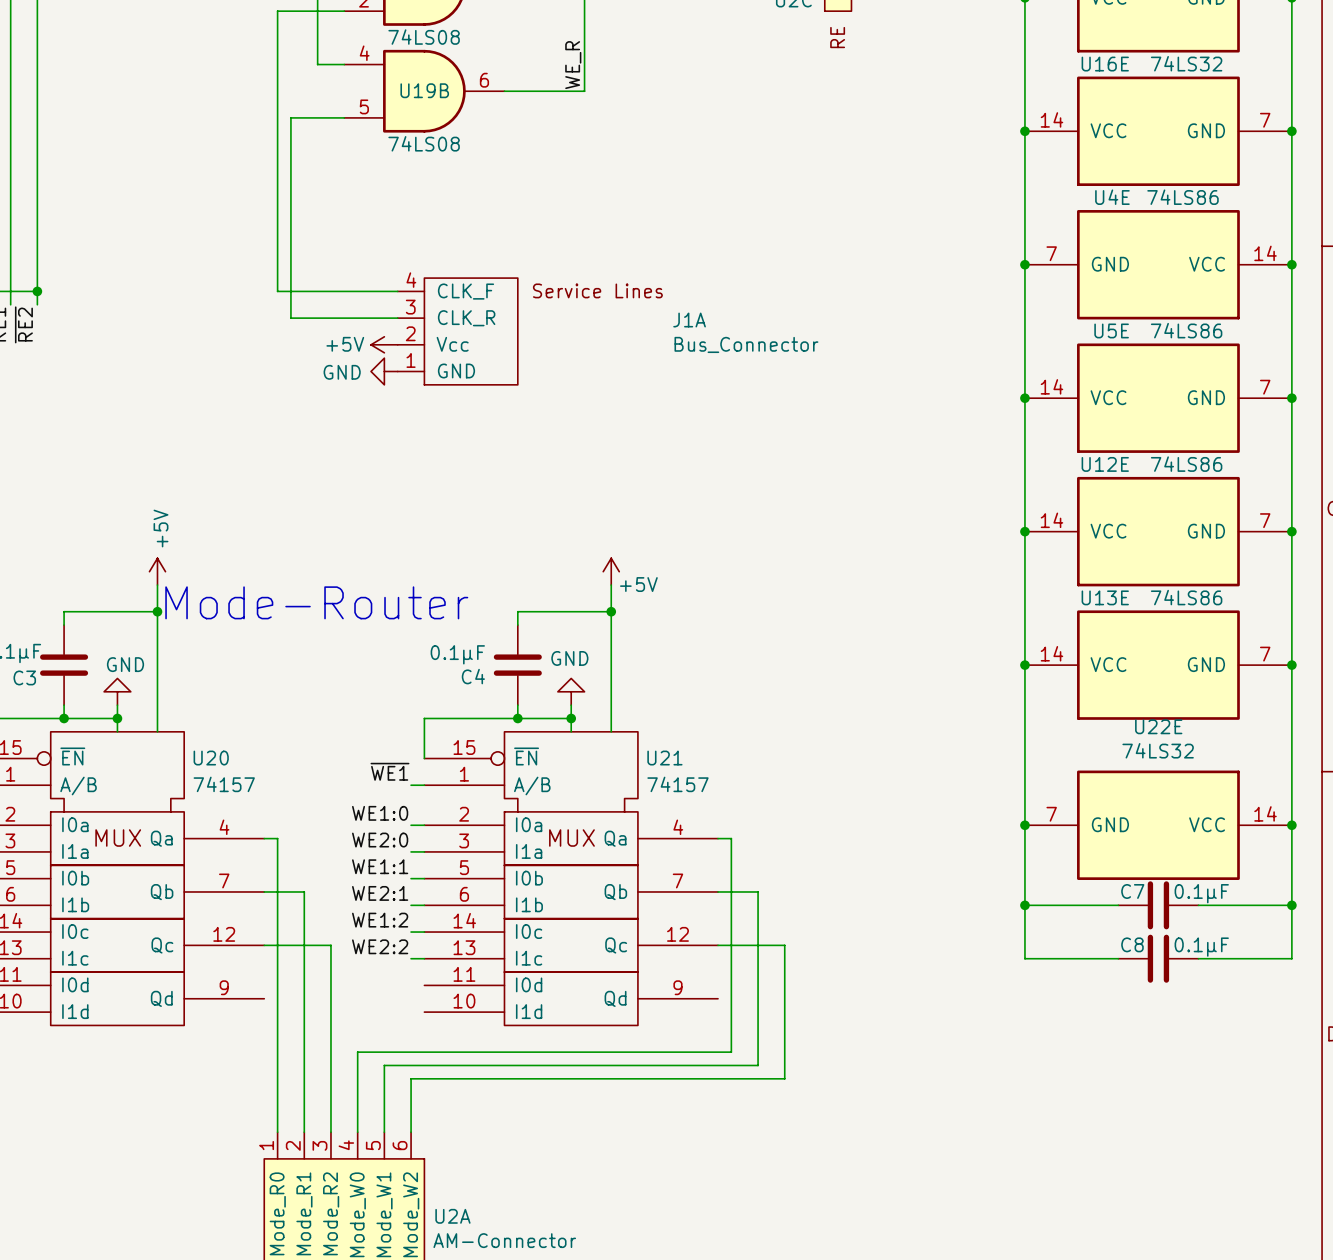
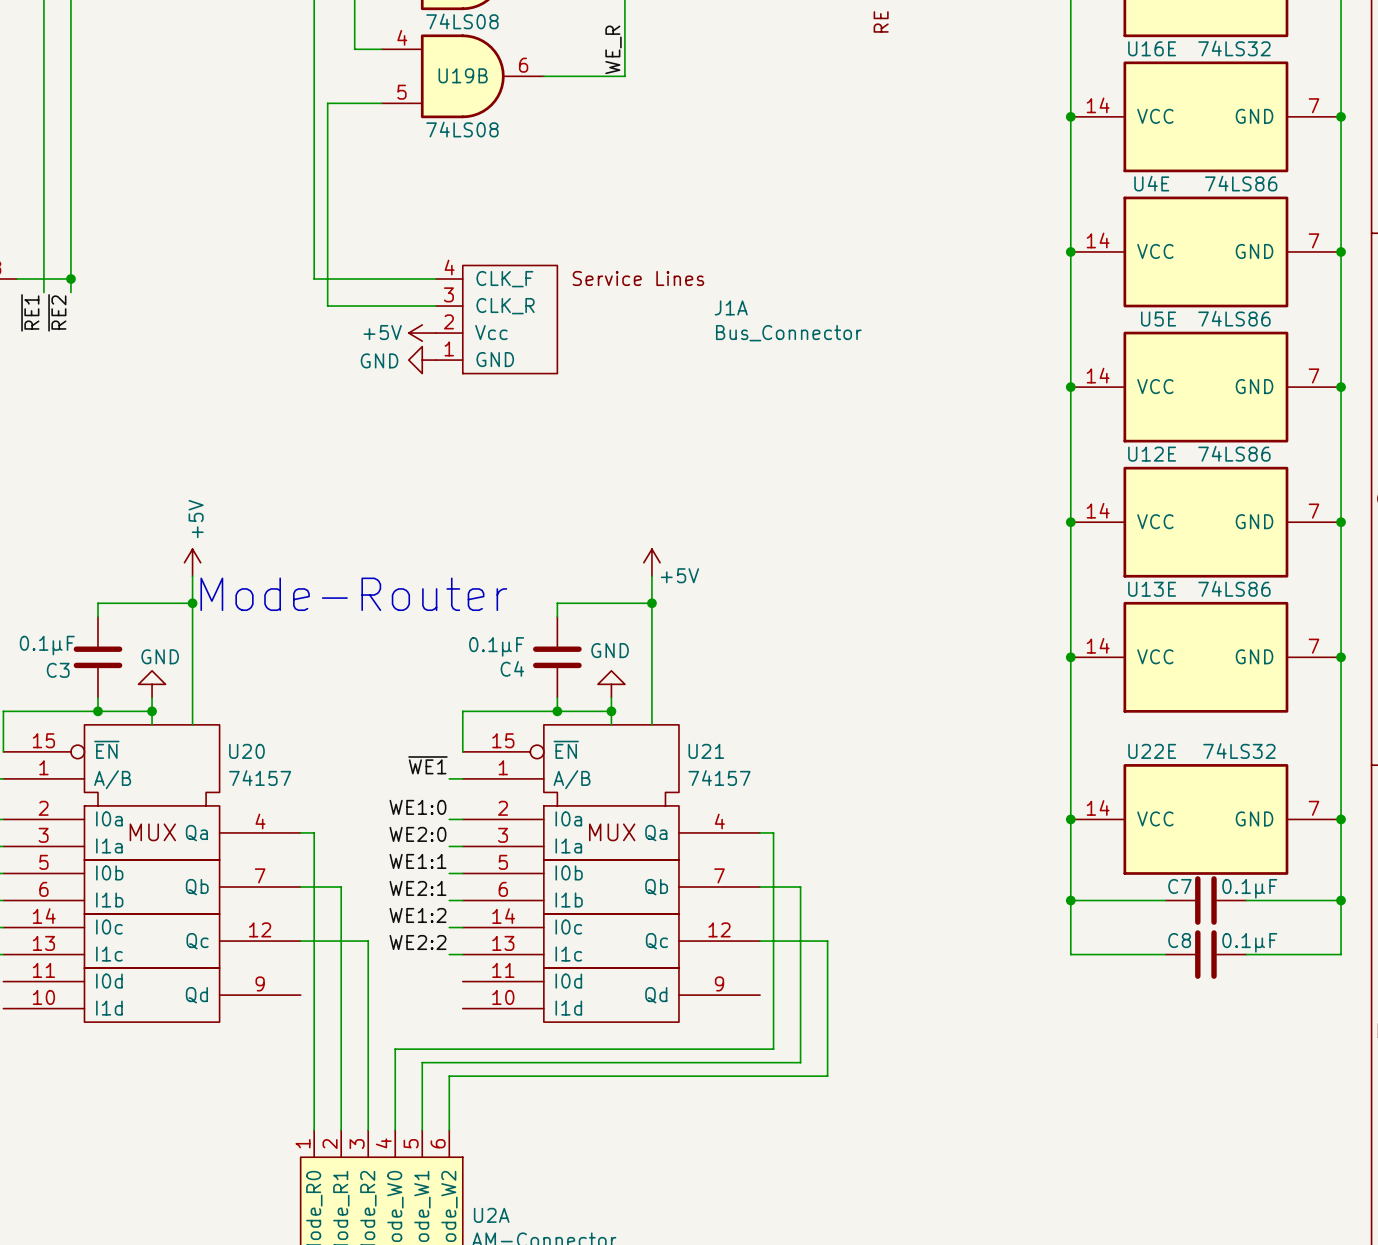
U4E rotation: 0° (1158, 264) -> 180° (1205, 251)
U22E name position: U22E (1158, 726) -> U22E (1152, 751)
U22E value position: 74LS32 (1158, 750) -> 74LS32 (1239, 751)
U22E rotation: 0° (1158, 825) -> 180° (1205, 819)

